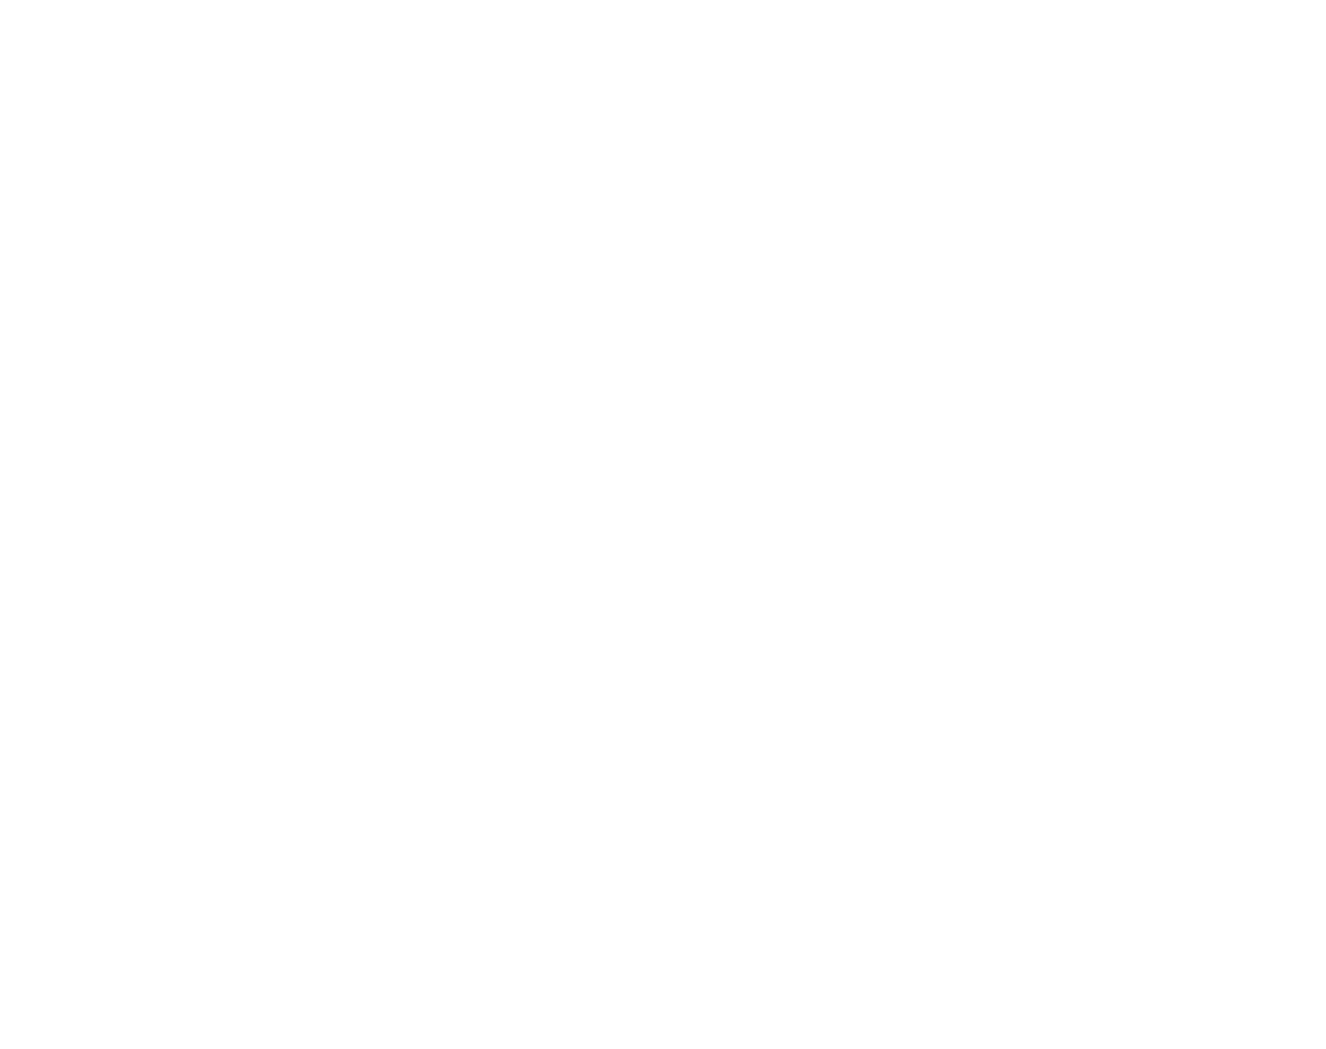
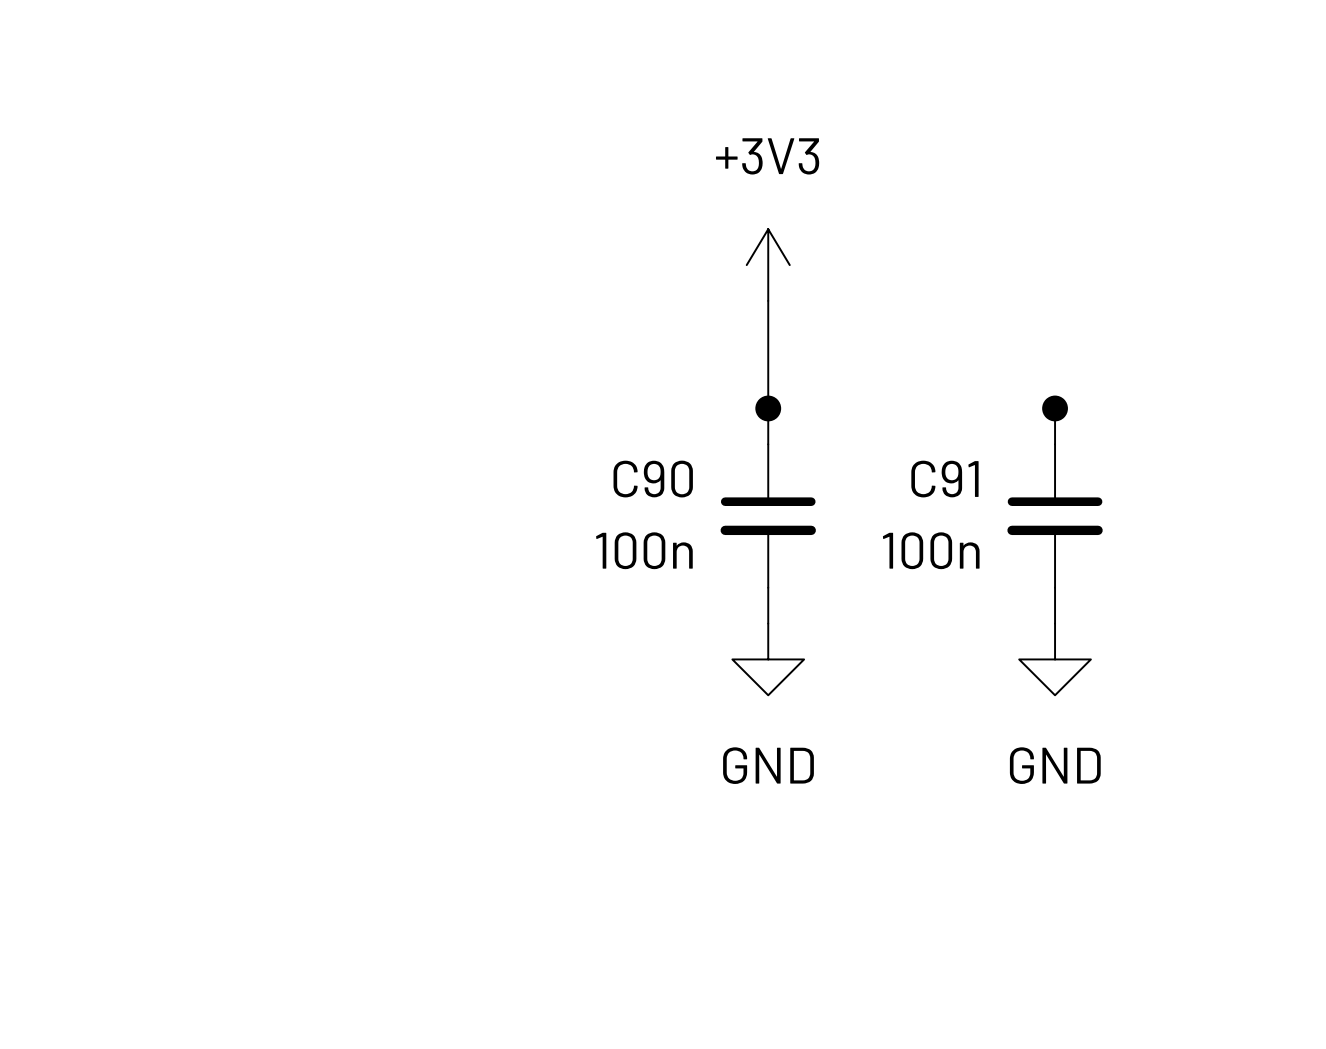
power symbol: none -> +3V3 (768, 265)
wire: none -> (768, 300) (768, 444)
junction: none -> (768, 408)
wire: none -> (1055, 408) (1055, 444)
junction: none -> (1055, 408)
C90: none -> 100n (768, 516)
C91: none -> 100n (1055, 516)
wire: none -> (768, 587) (768, 623)
wire: none -> (1055, 587) (1055, 623)
power symbol: none -> GND (768, 659)
power symbol: none -> GND (1055, 659)

